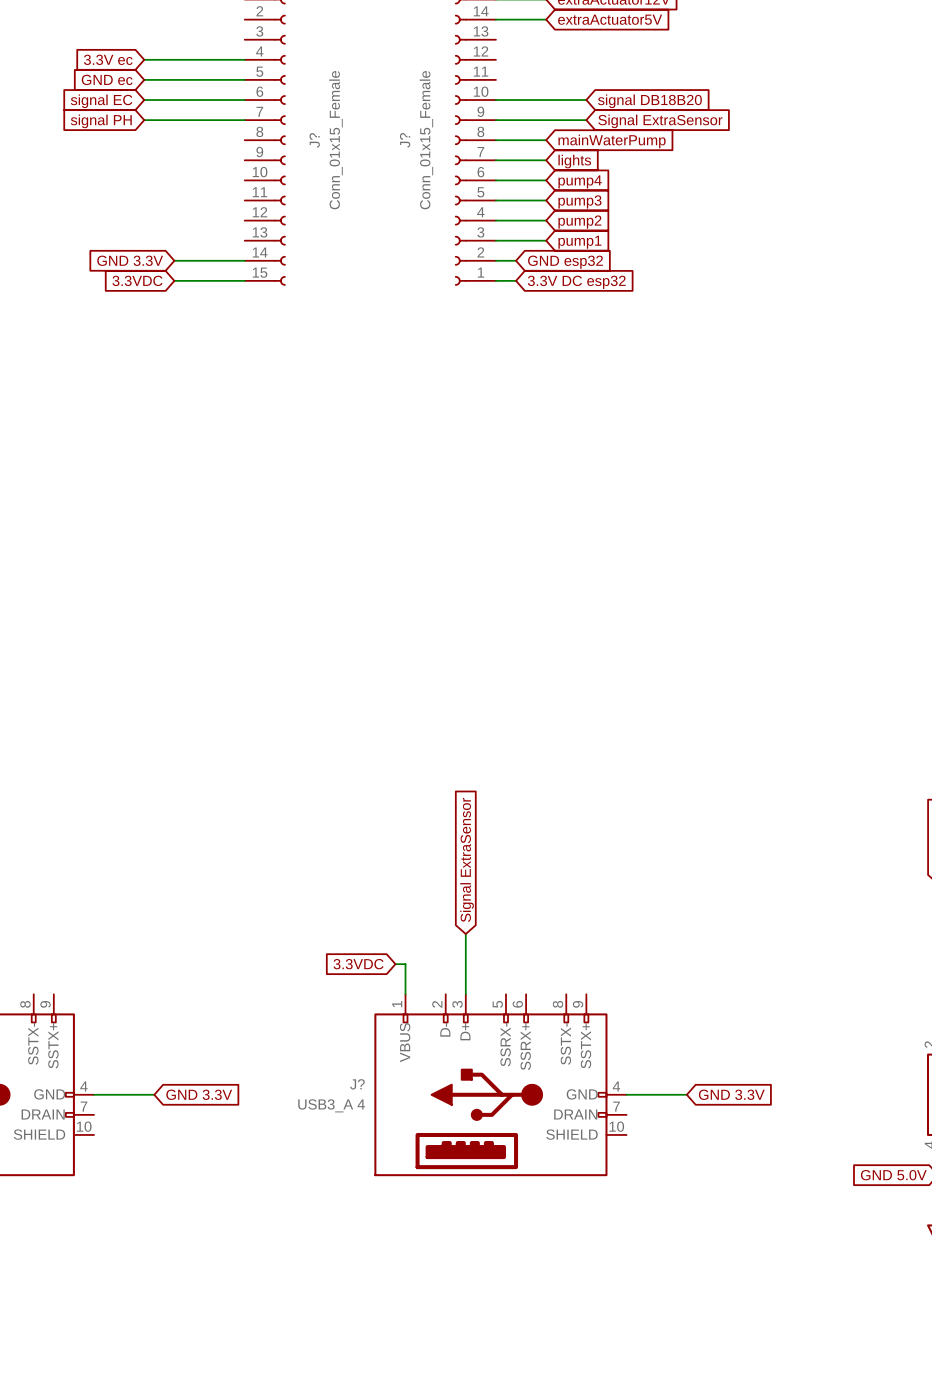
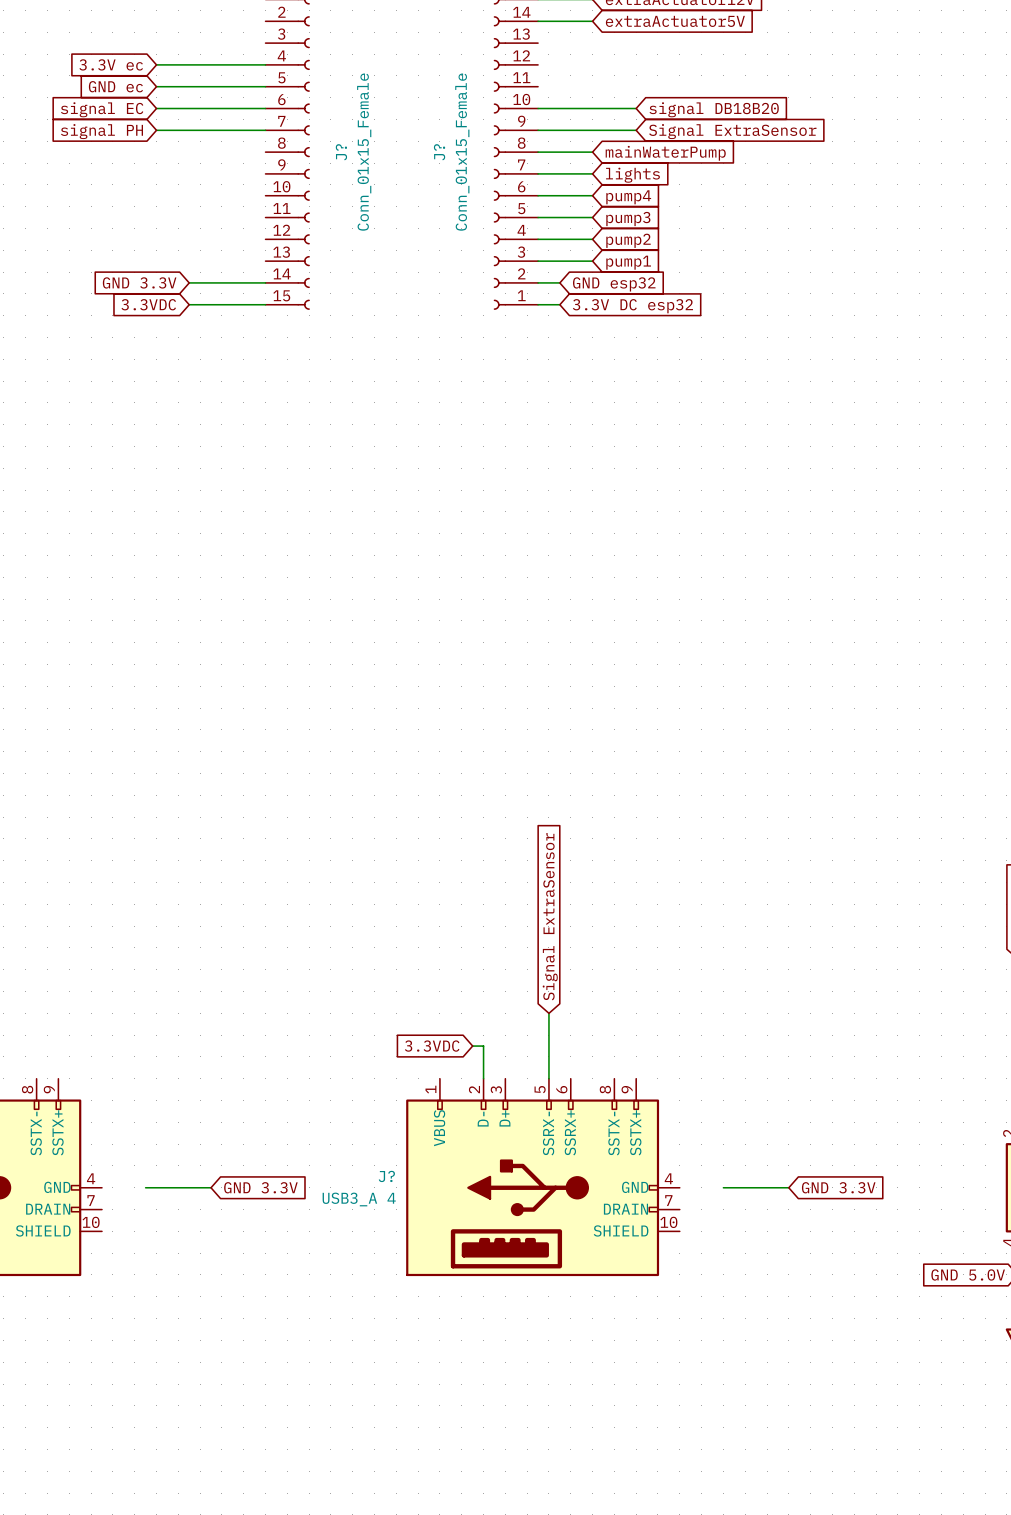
global label position: Signal ExtraSensor (467, 859) -> Signal ExtraSensor (550, 916)
wire: (465, 934) (465, 994) -> (548, 1013) (548, 1078)
global label position: 3.3VDC (358, 964) -> 3.3VDC (432, 1046)
wire: (395, 964) (405, 964) (405, 994) -> (472, 1046) (483, 1046) (483, 1078)
wire: (94, 1094) (134, 1094) -> (167, 1187) (211, 1187)
global label position: GND 3.3V (199, 1094) -> GND 3.3V (260, 1187)
wire: (626, 1094) (666, 1094) -> (745, 1187) (788, 1187)
global label position: GND 3.3V (731, 1094) -> GND 3.3V (838, 1187)

